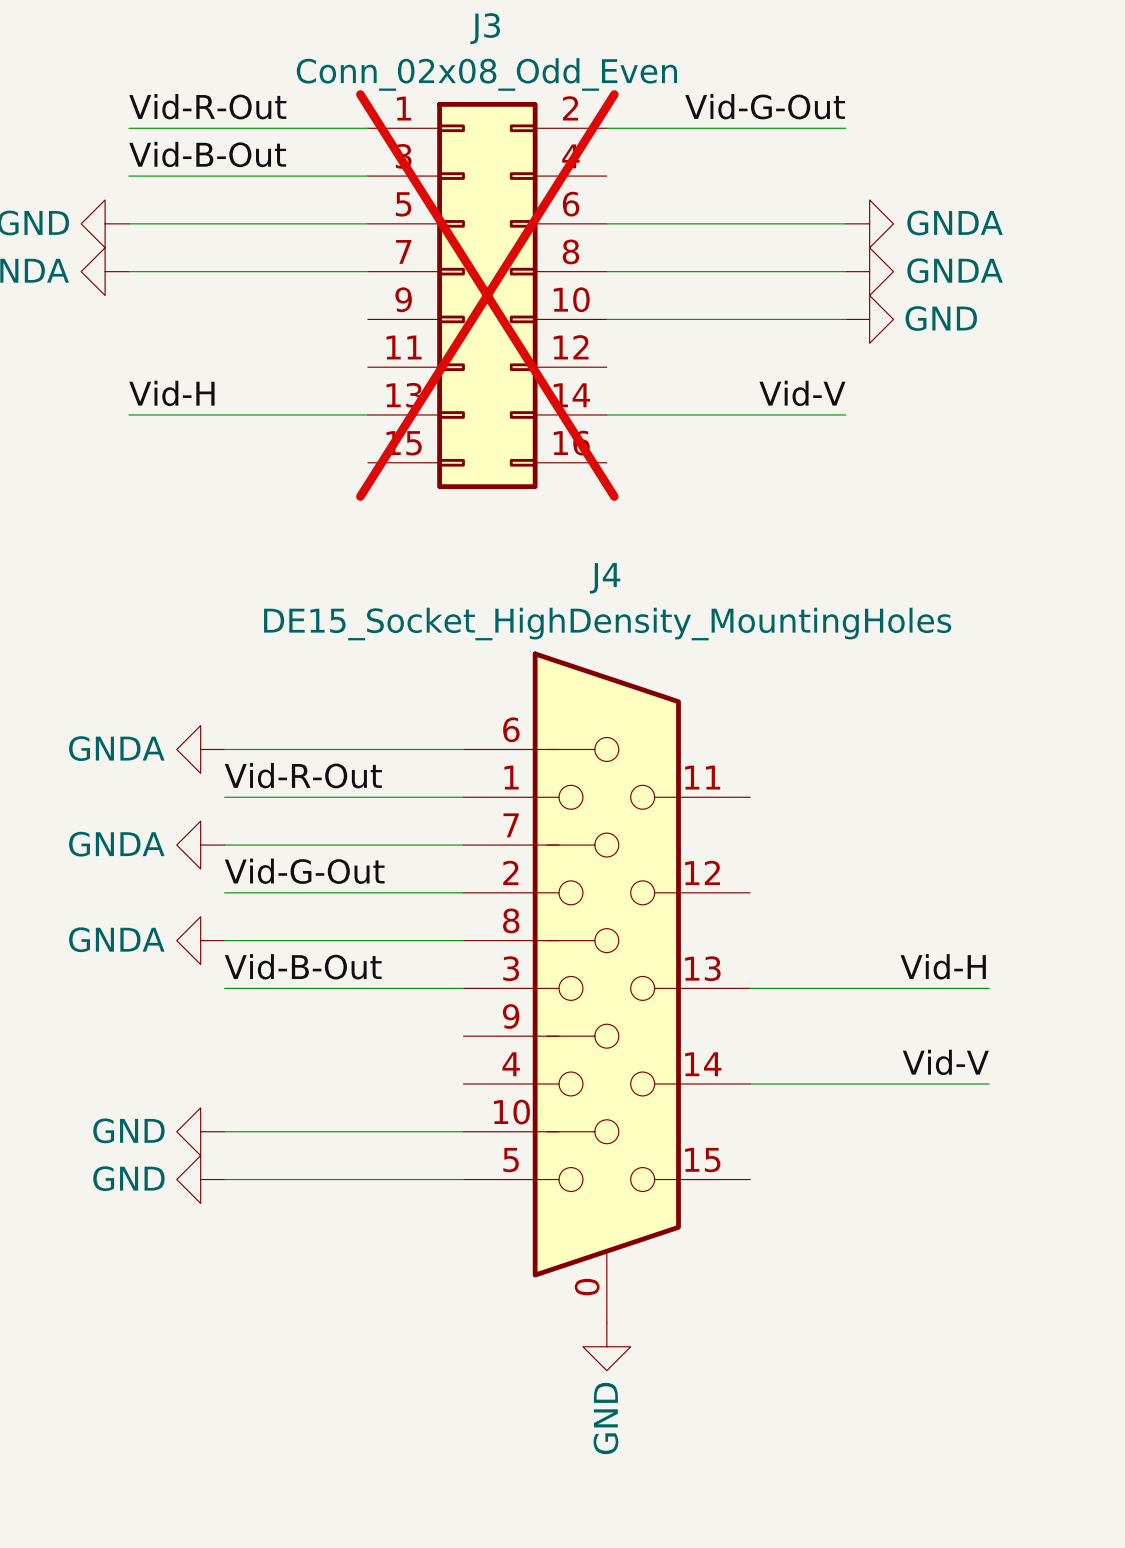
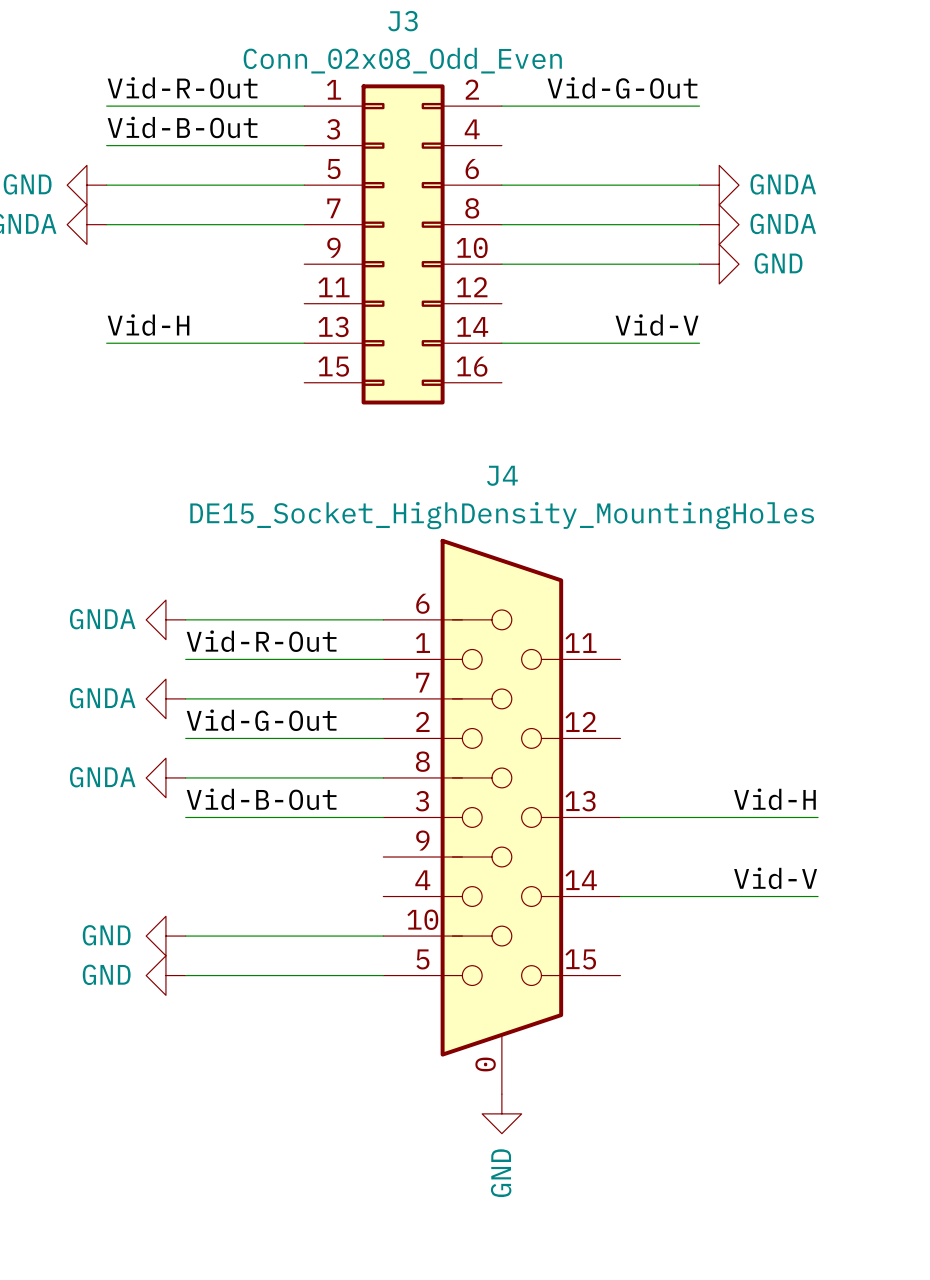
J3 do-not-place cross: (487, 295) -> none

